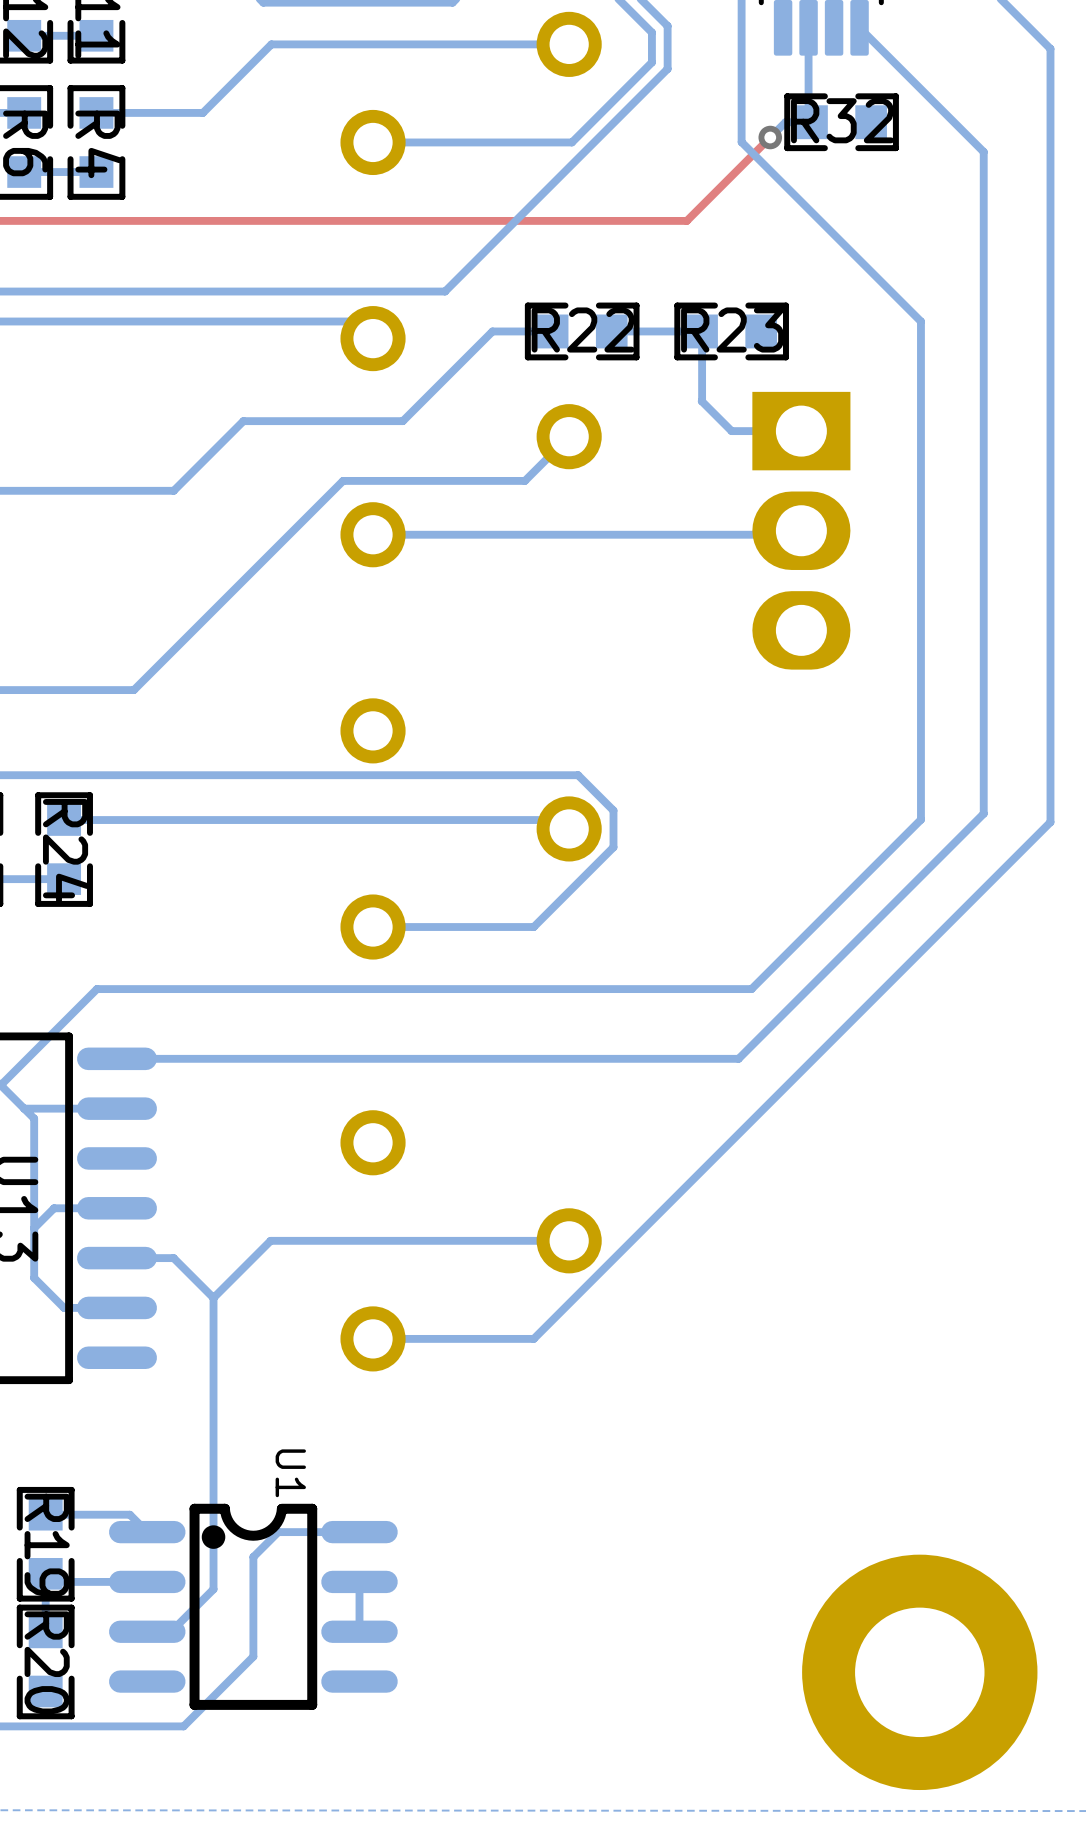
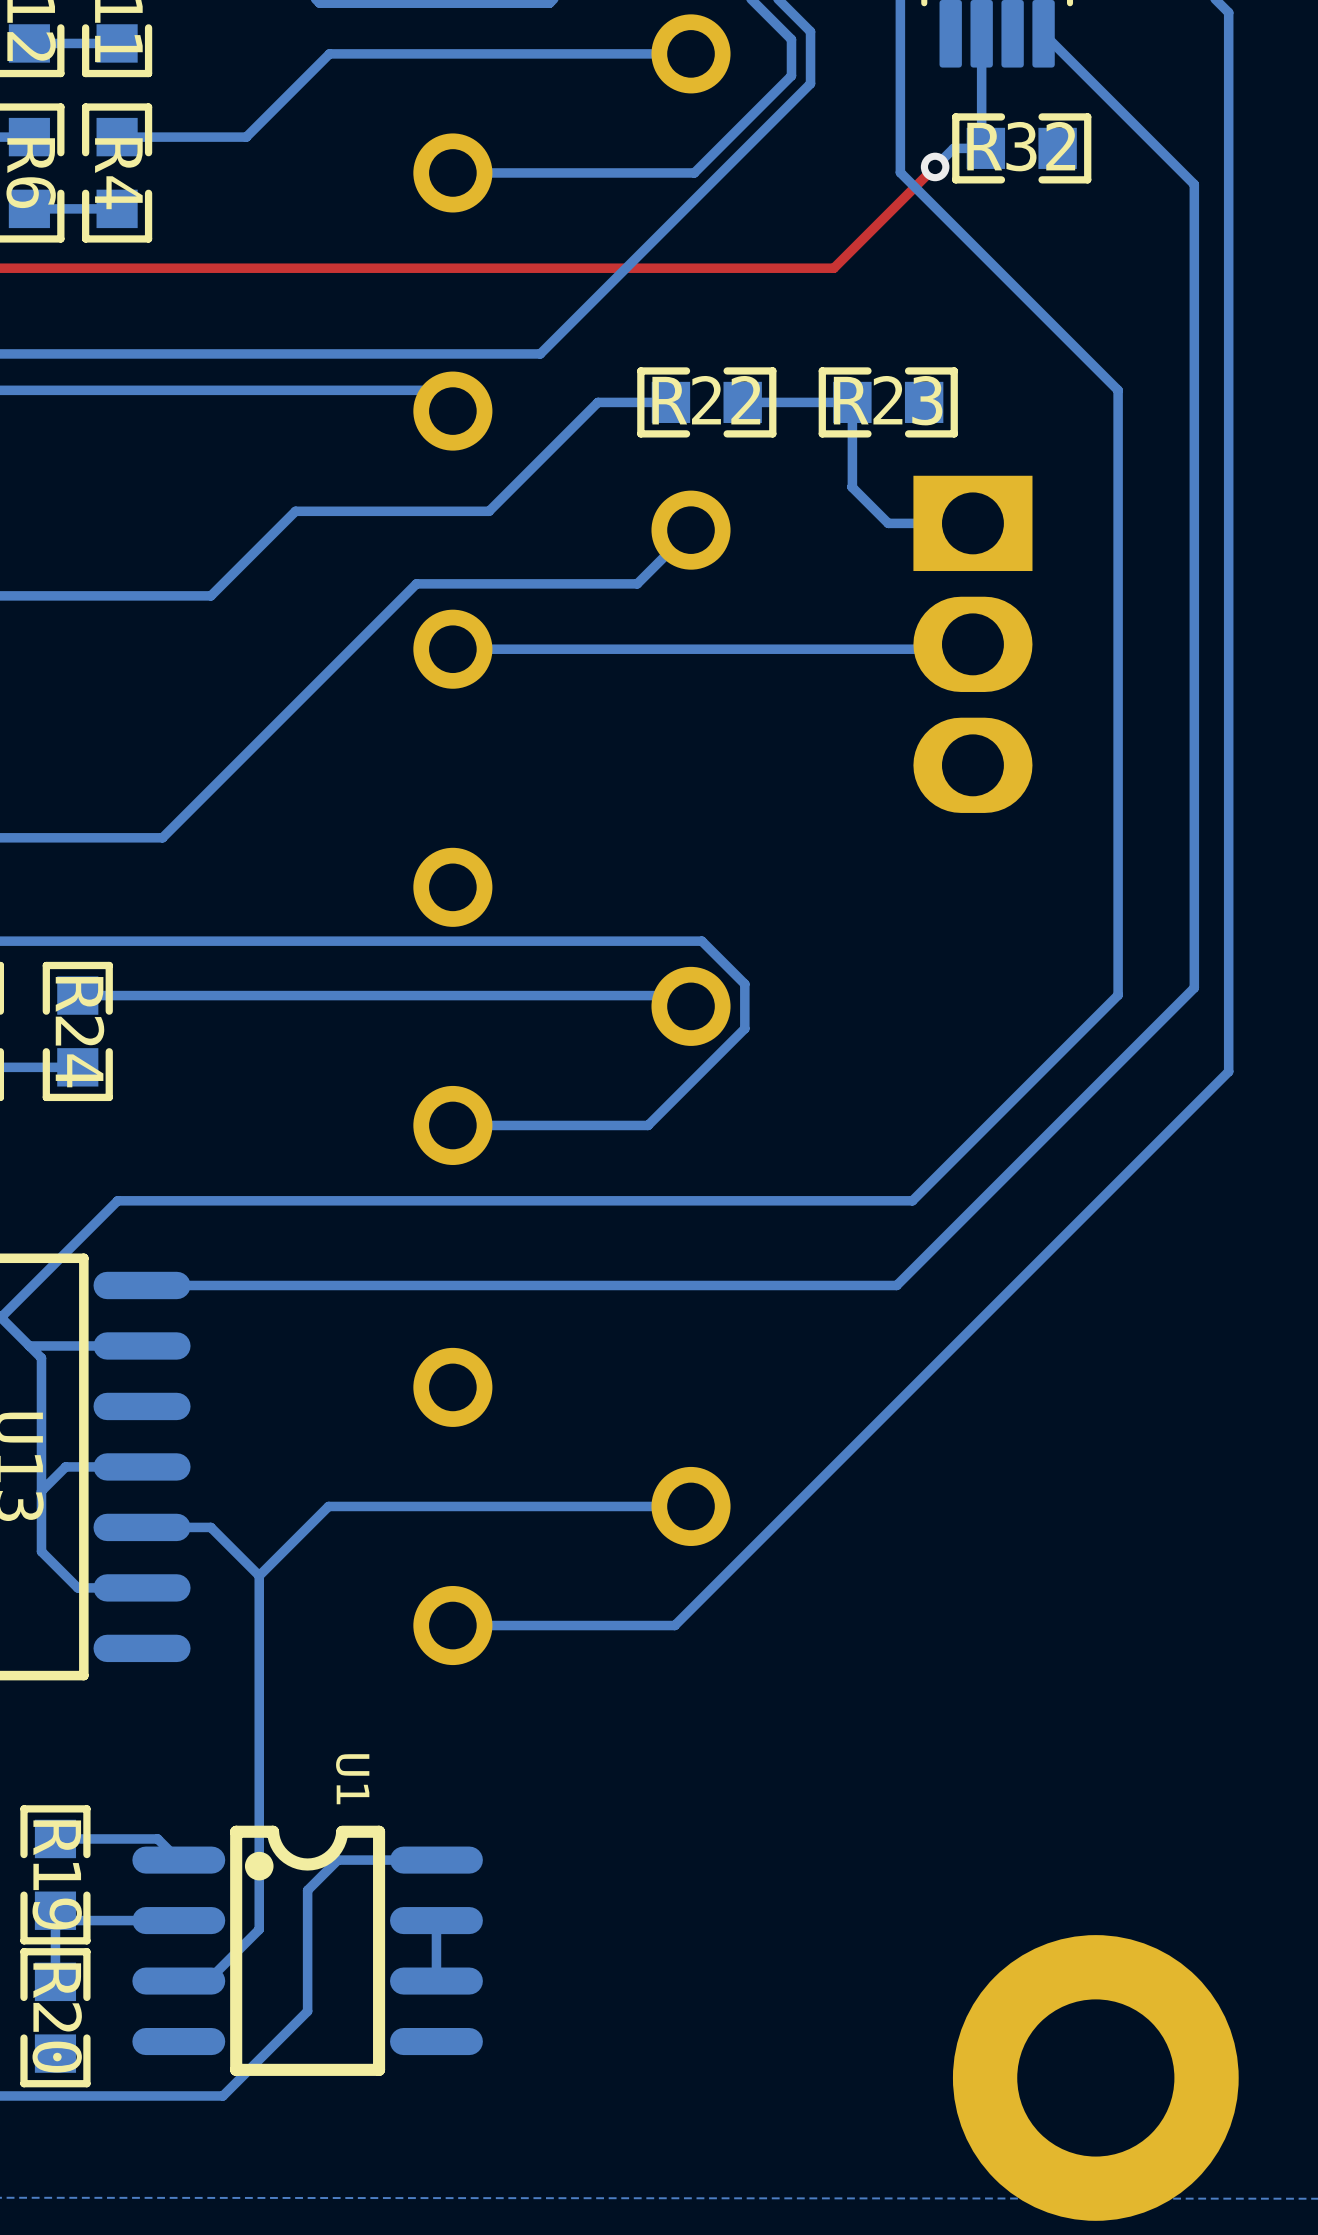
bottom track: (1012, 10) (1050, 48) (1050, 822) (533, 1338) -> (1228, 12) (1228, 1071) (674, 1625) (648, 1625)
part position: (919, 1672) -> (1095, 2077)

